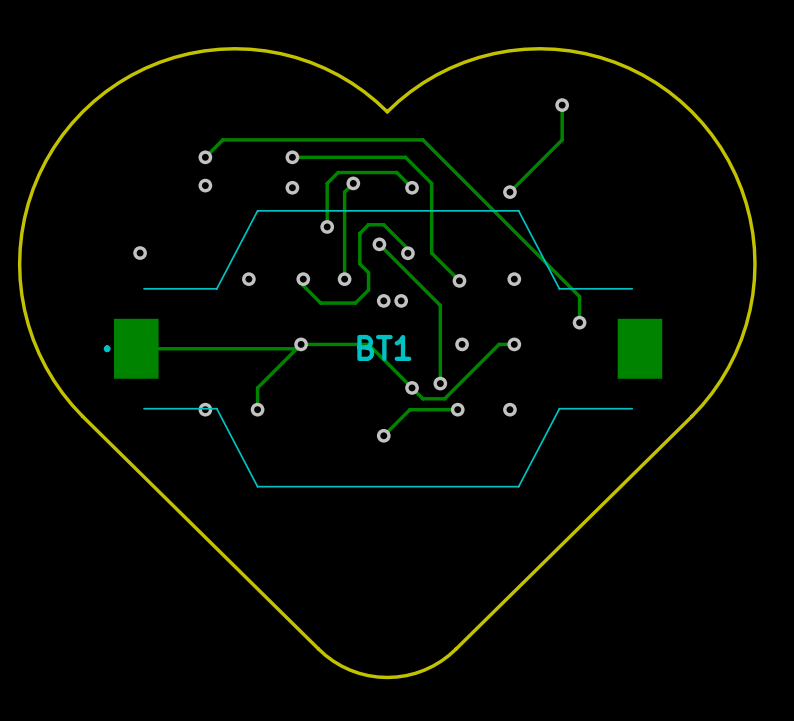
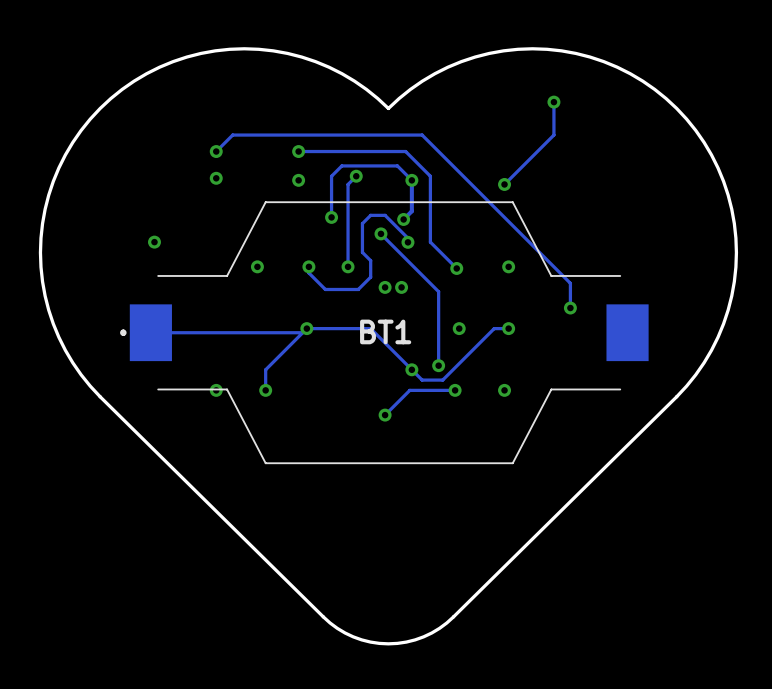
track: none -> (411, 180) (411, 211) (403, 219)
via: none -> (403, 219)

